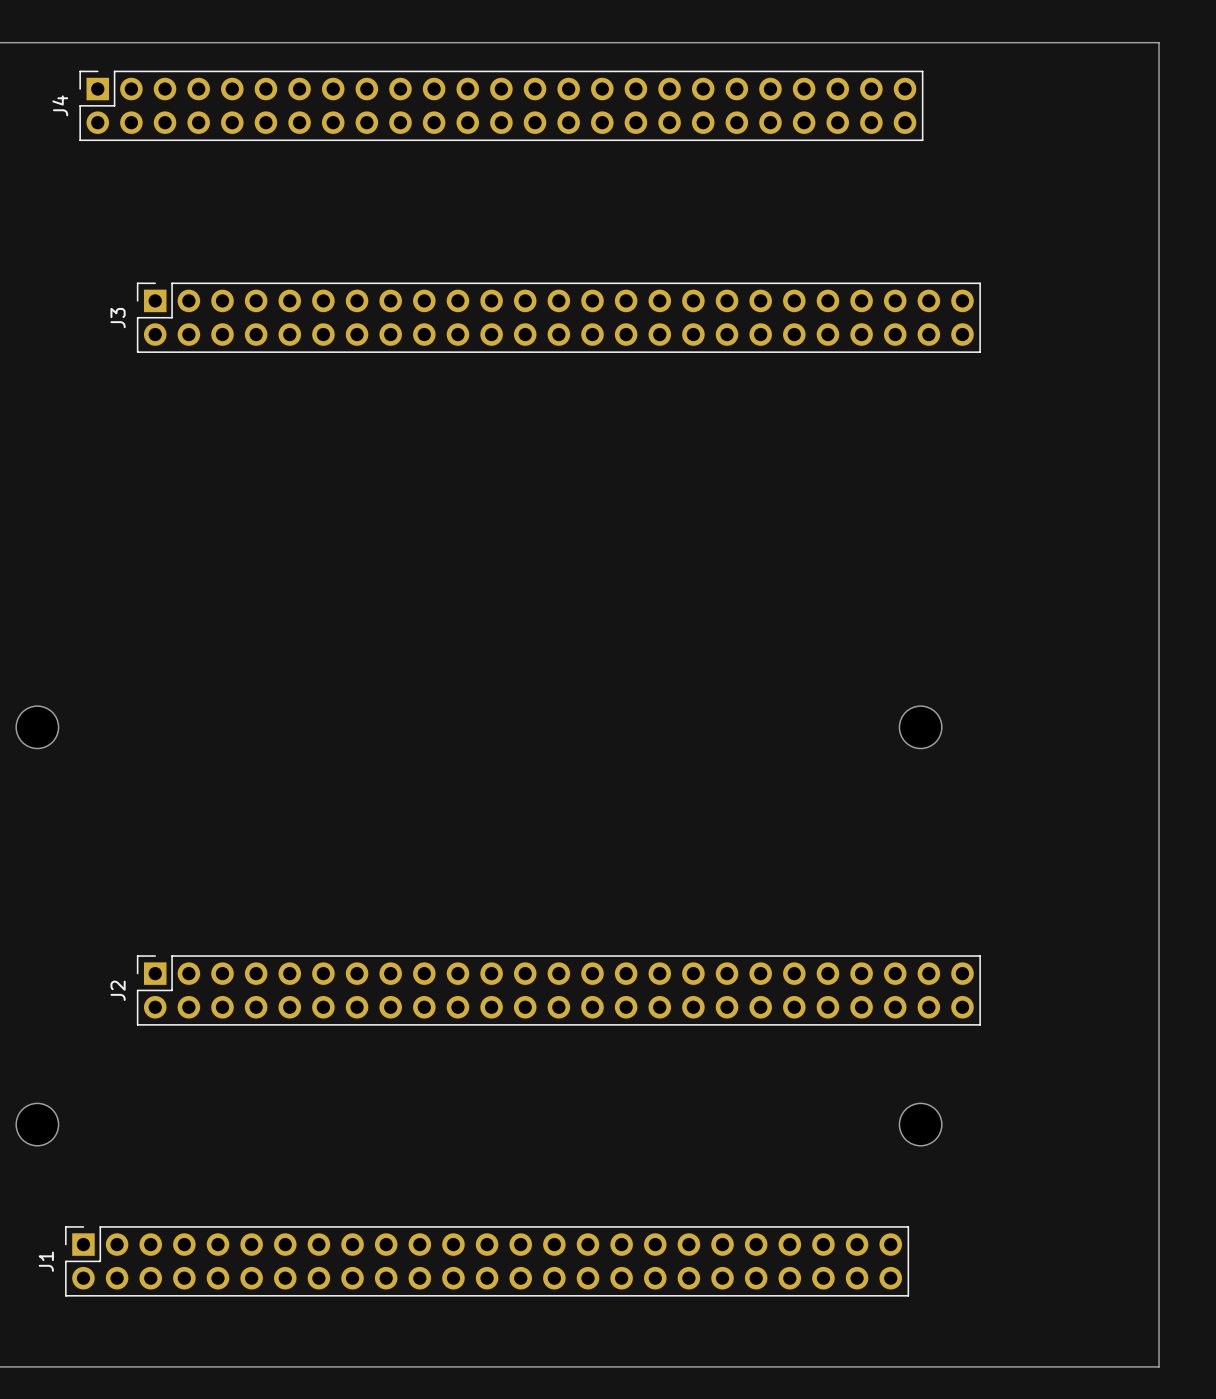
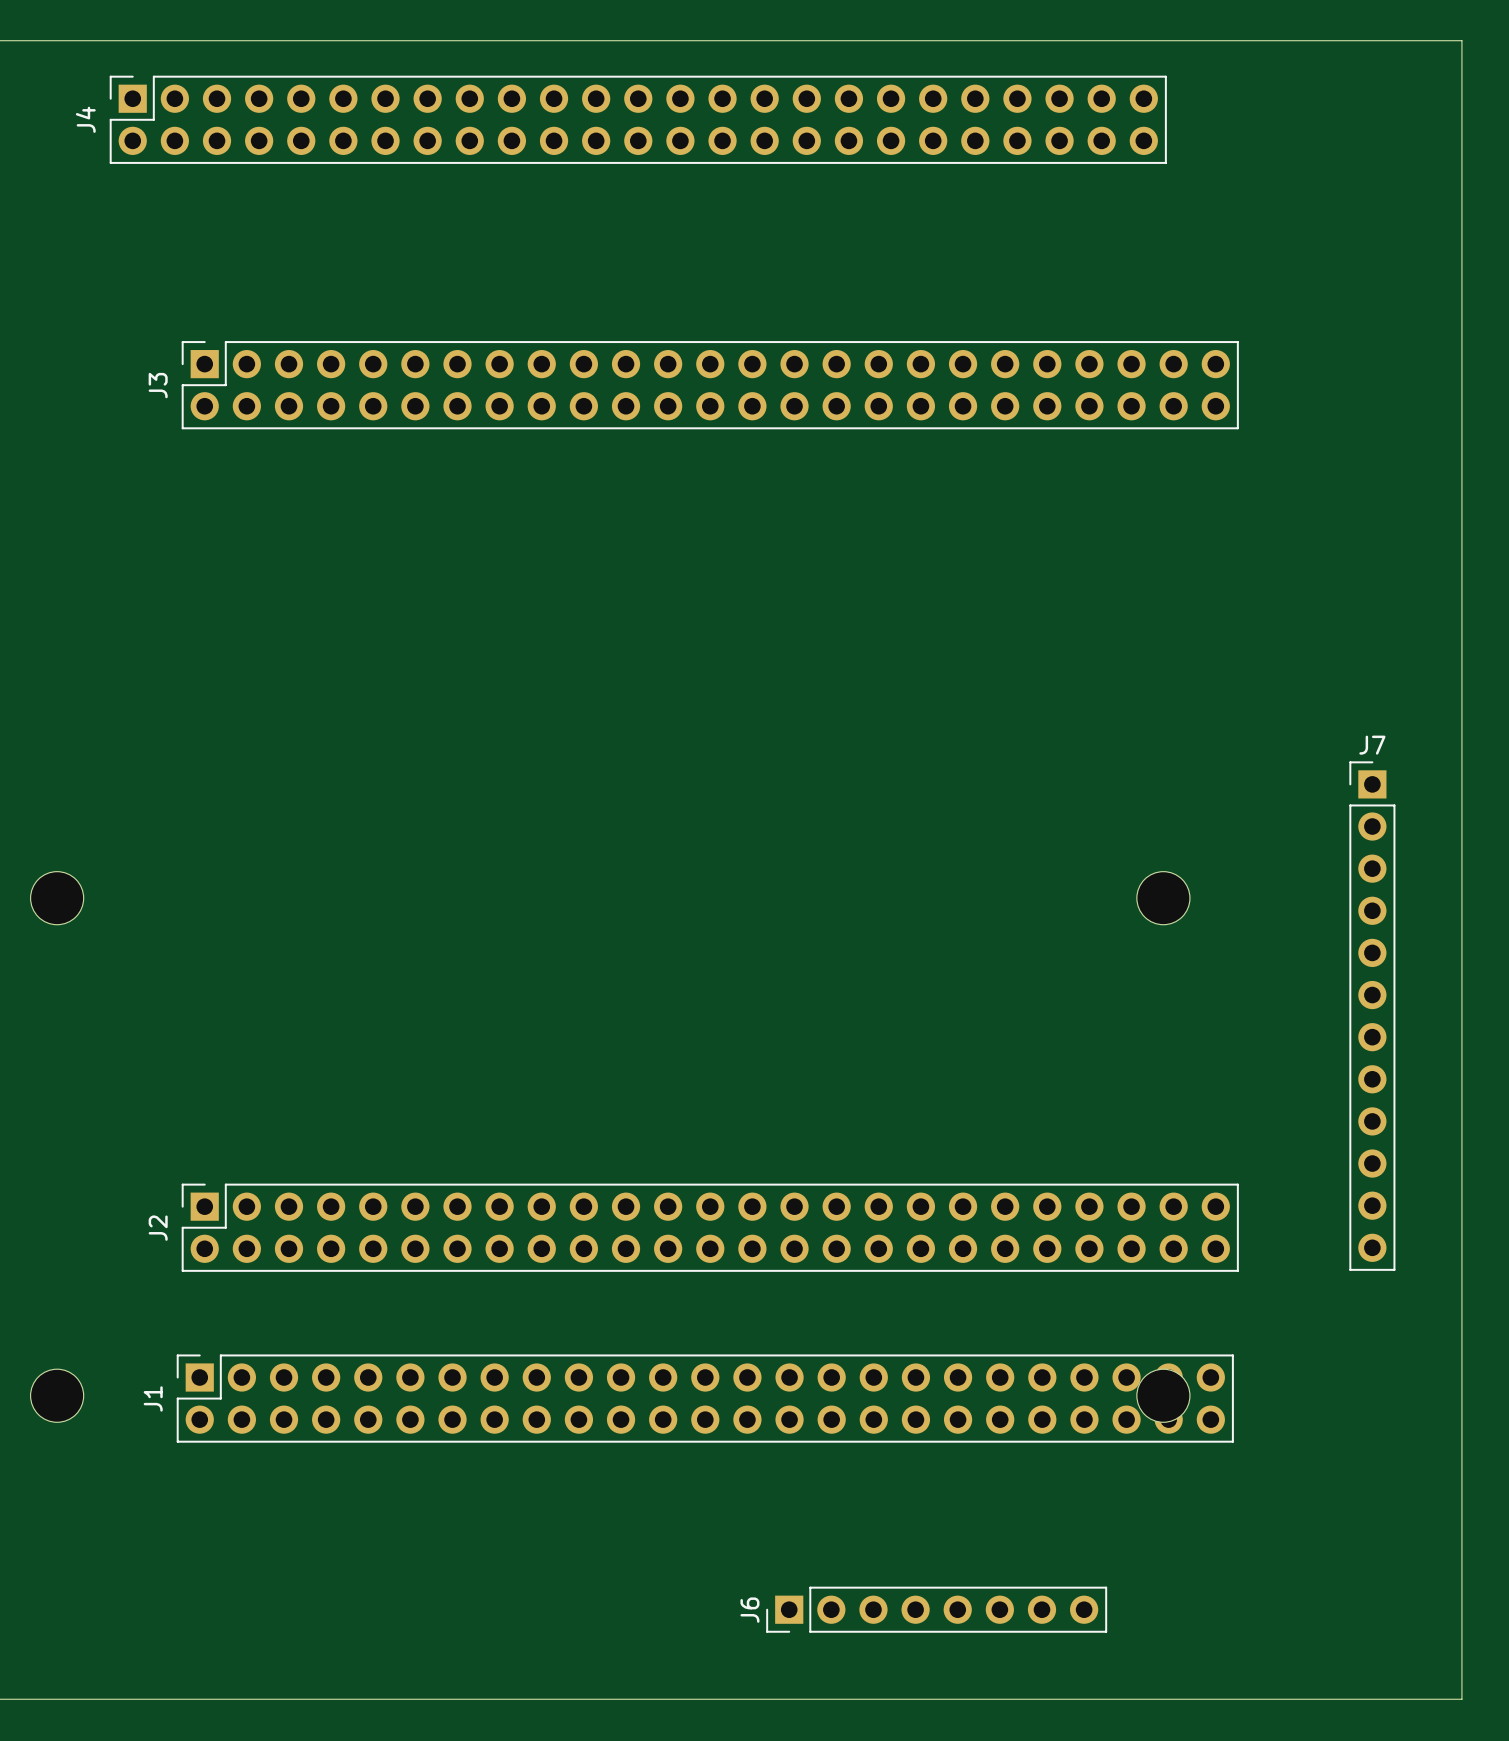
J7: none -> (1372, 1016)
J1 position: (487, 1261) -> (705, 1398)
J6: none -> (936, 1609)

